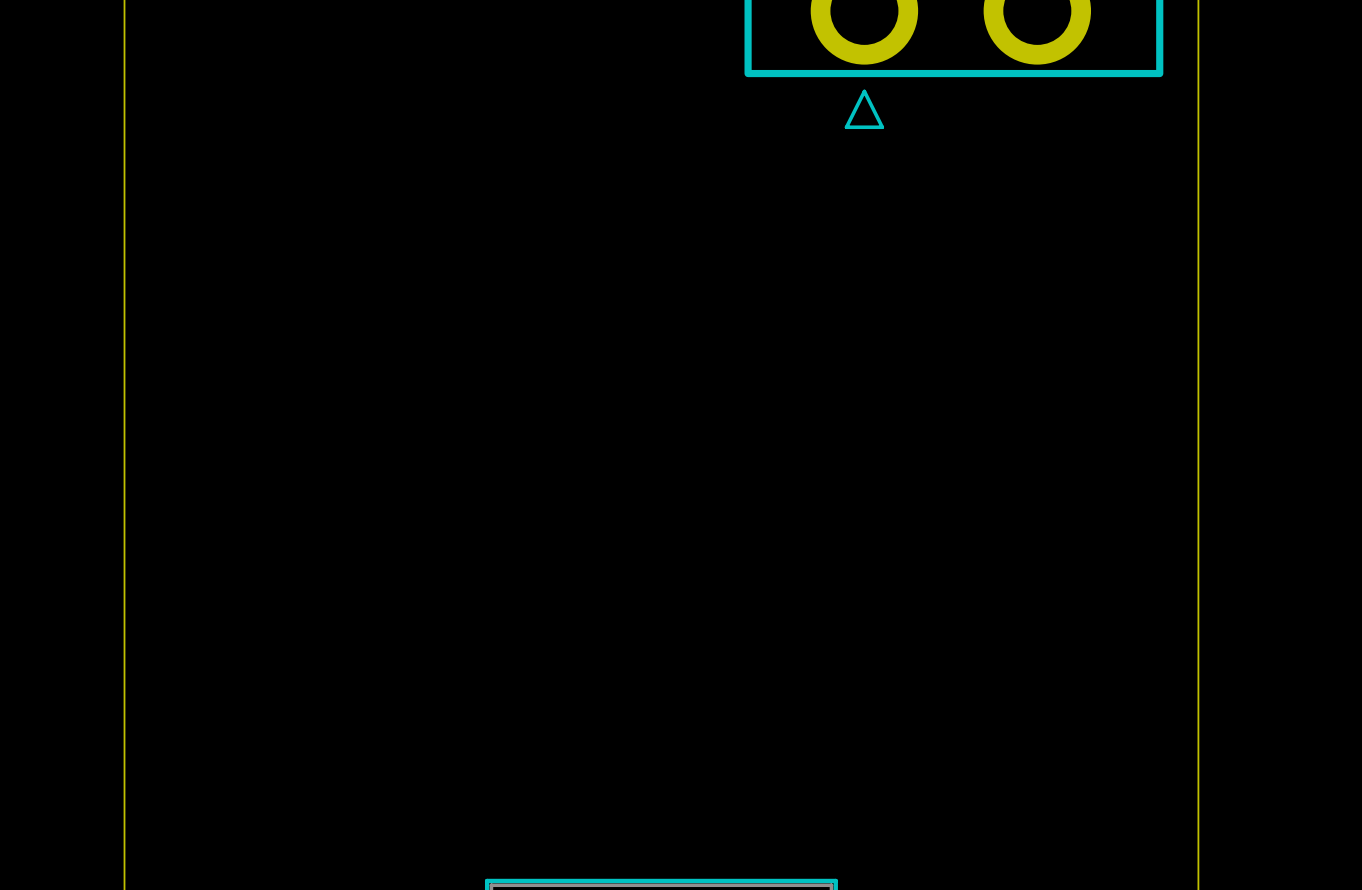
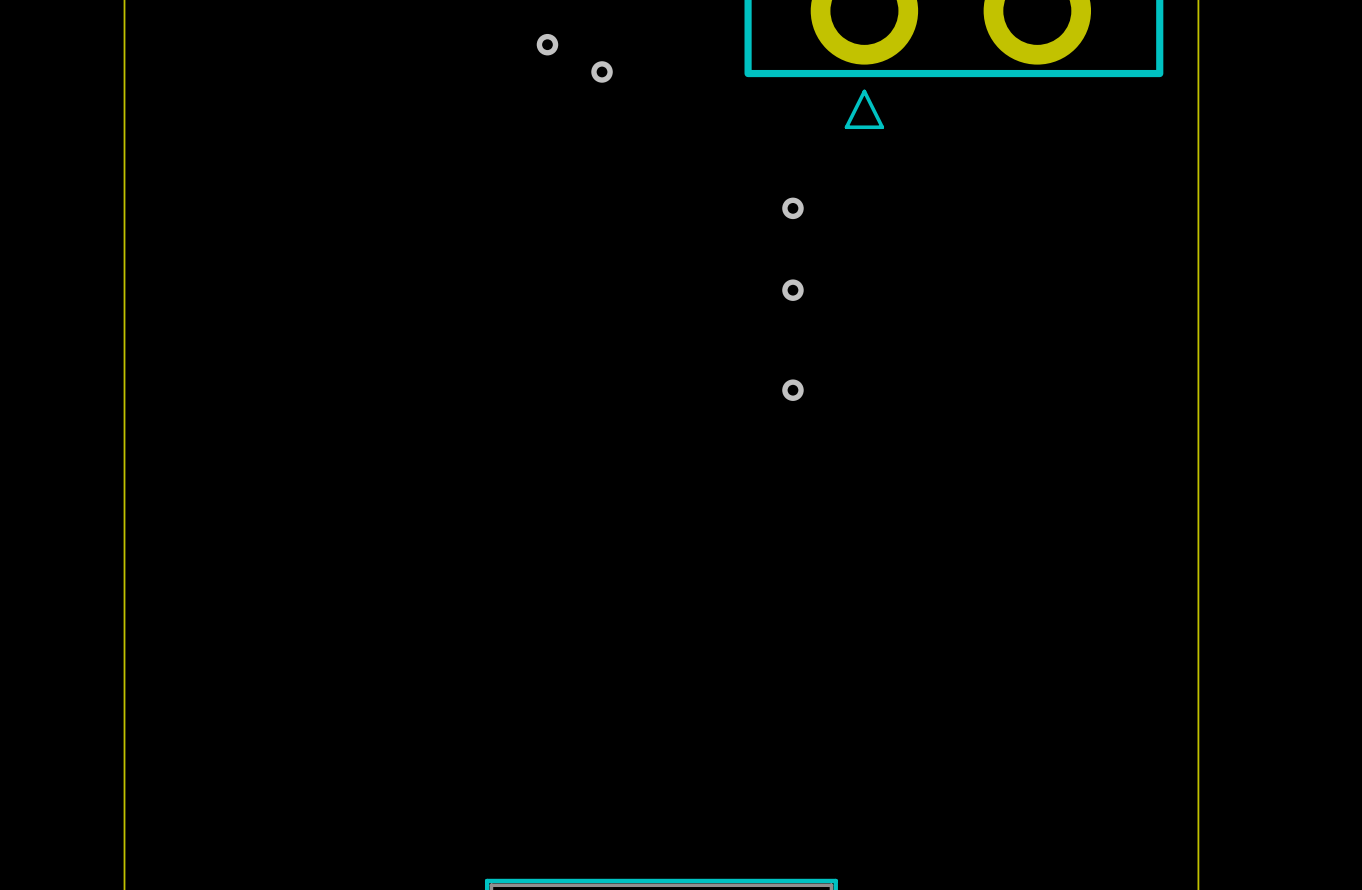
via: none -> (547, 44)
via: none -> (602, 71)
via: none -> (792, 208)
via: none -> (792, 290)
via: none -> (792, 390)

